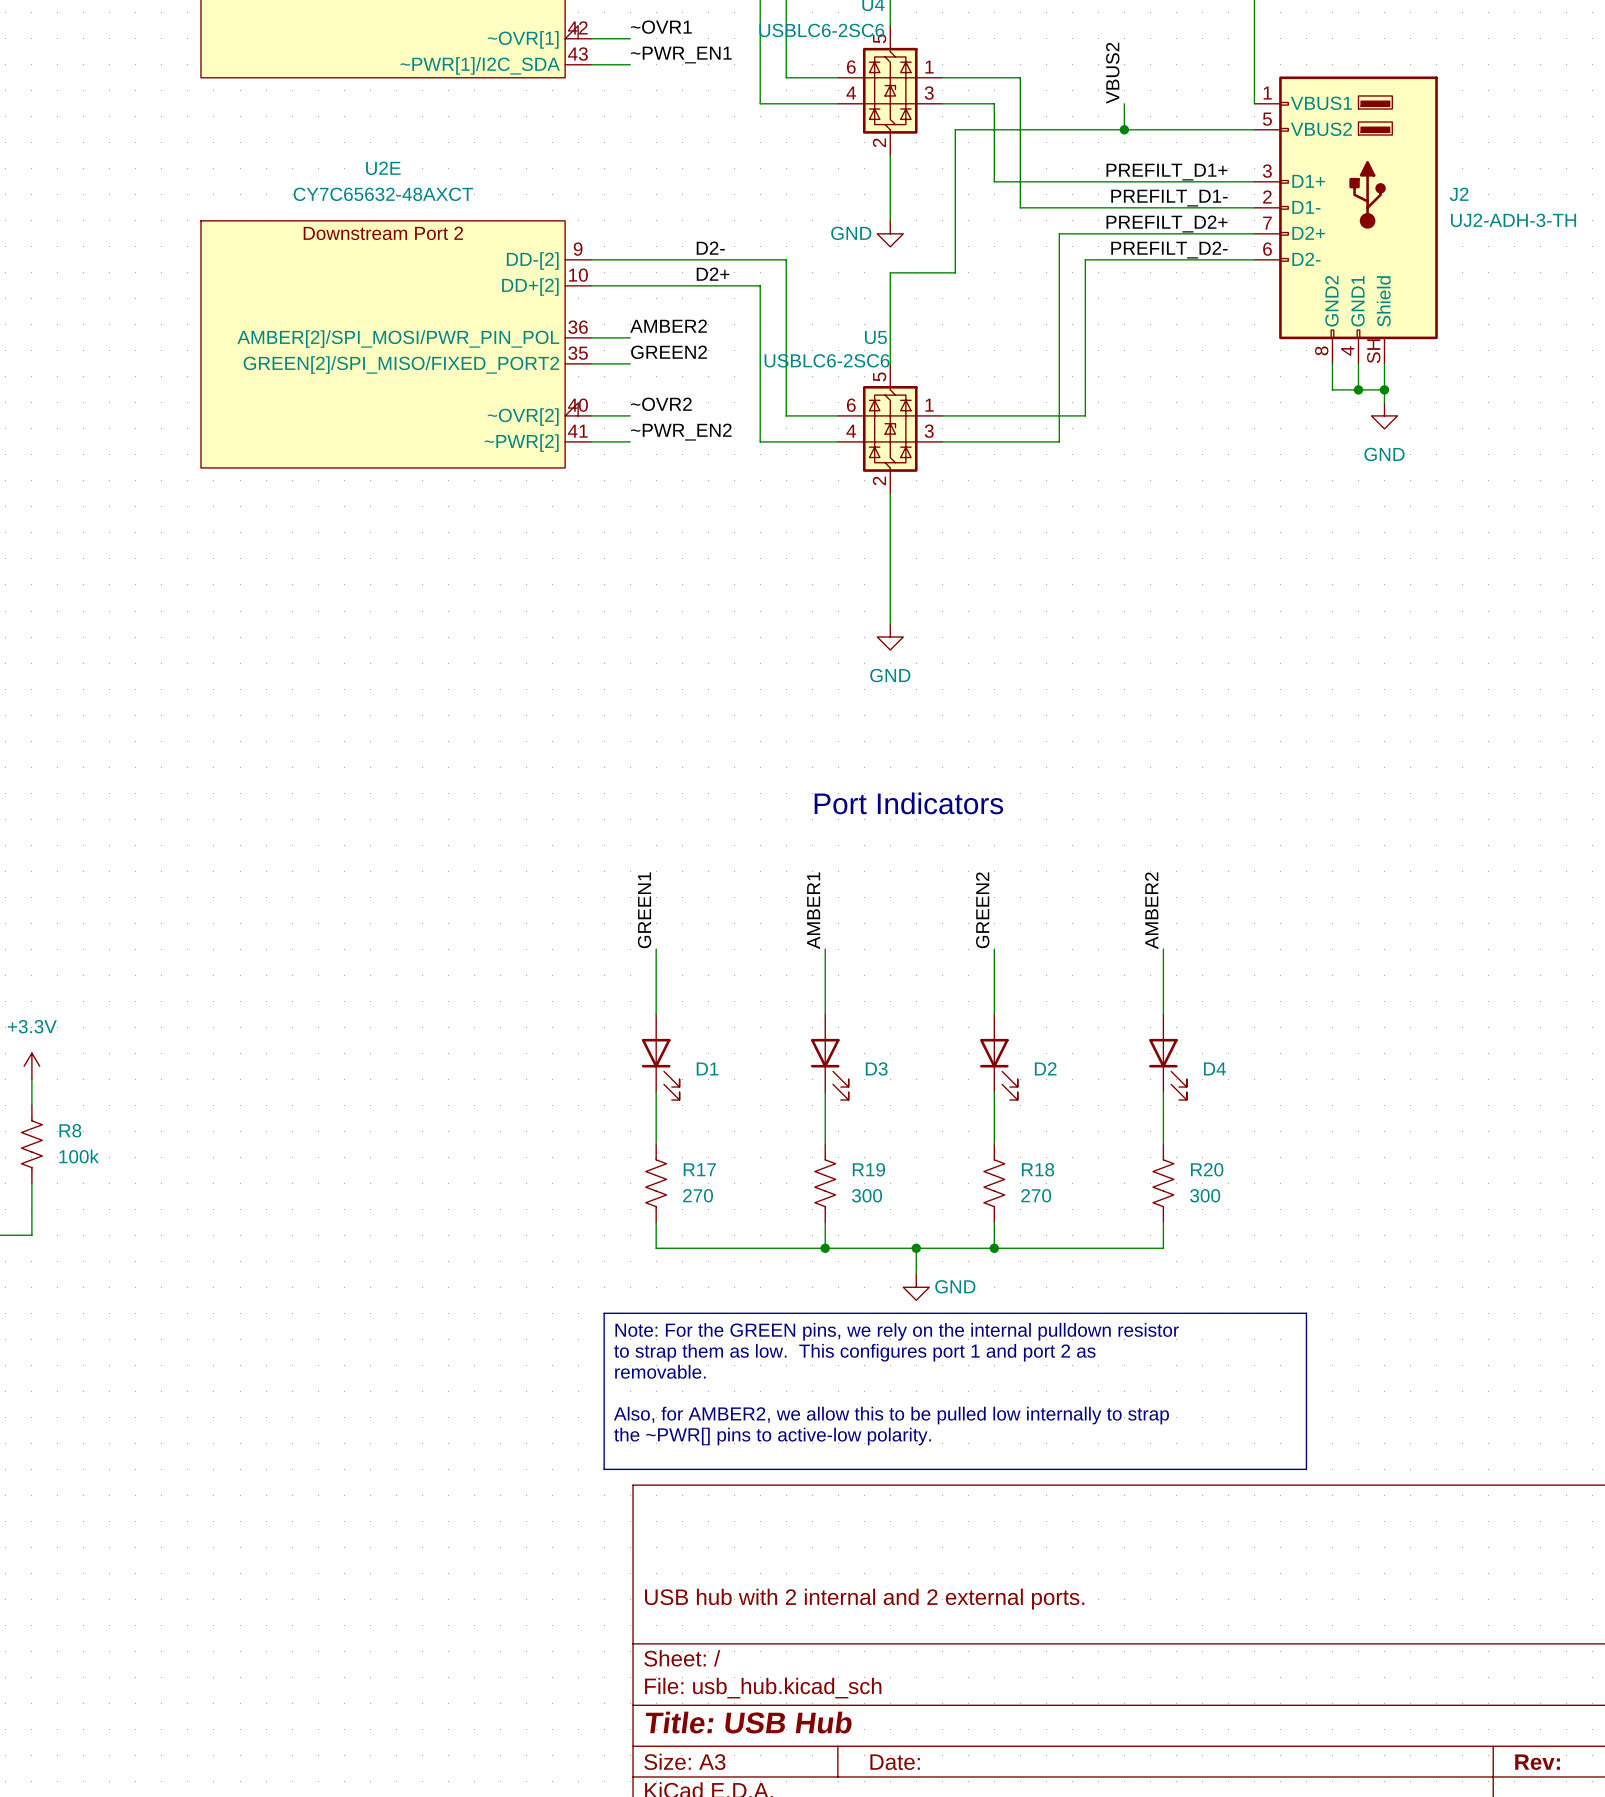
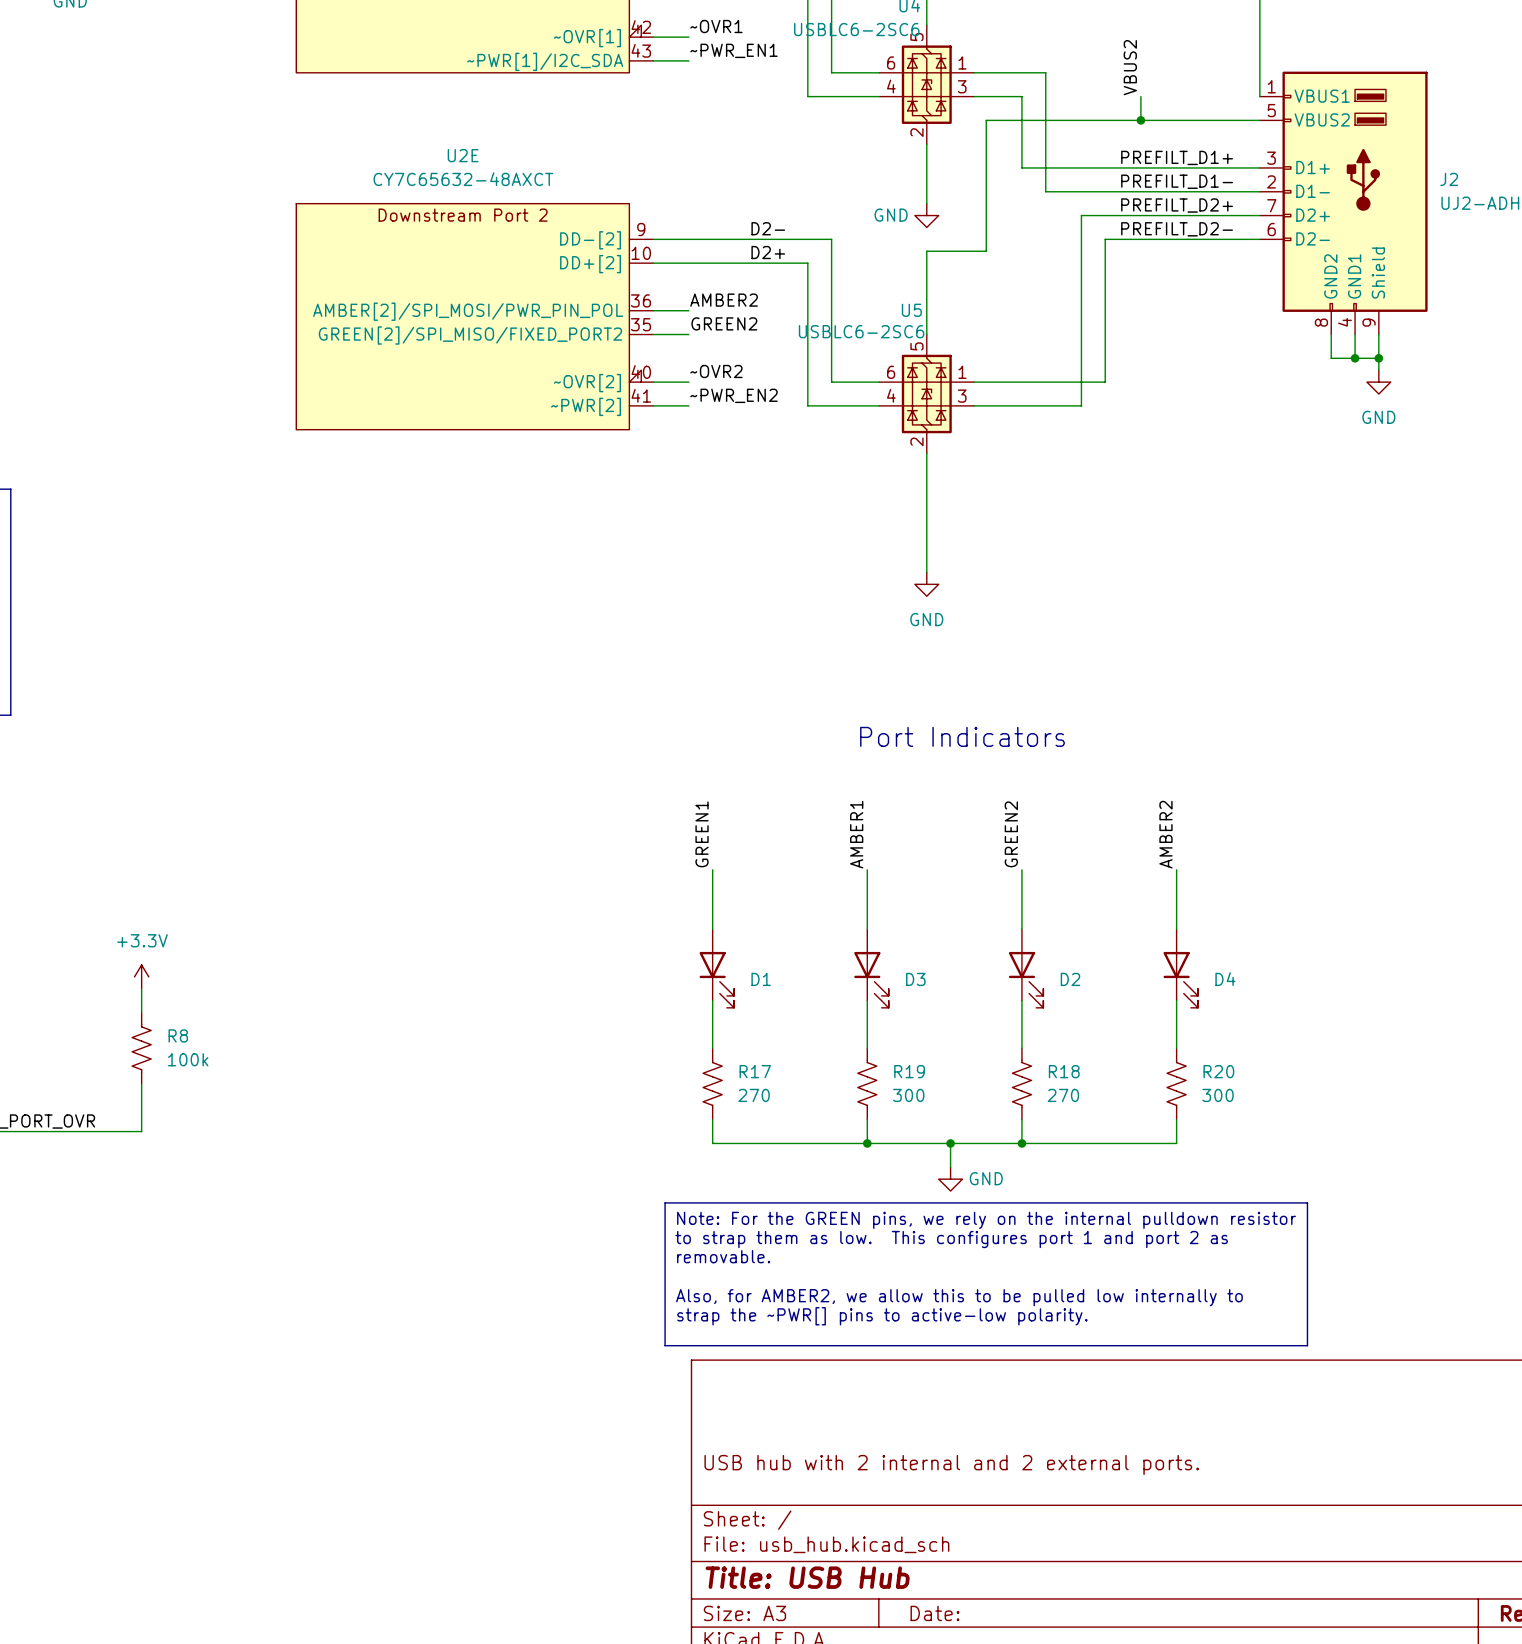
J2 pin number: SH (1373, 351) -> 9 (1369, 322)
text: Also, for AMBER2, we allow this to be pulled low internally to strap (891, 1415) -> Also, for AMBER2, we allow this to be pulled low internally to (959, 1297)
text: the ~PWR[] pins to active-low polarity. (772, 1436) -> strap the ~PWR[] pins to active-low polarity. (882, 1316)

